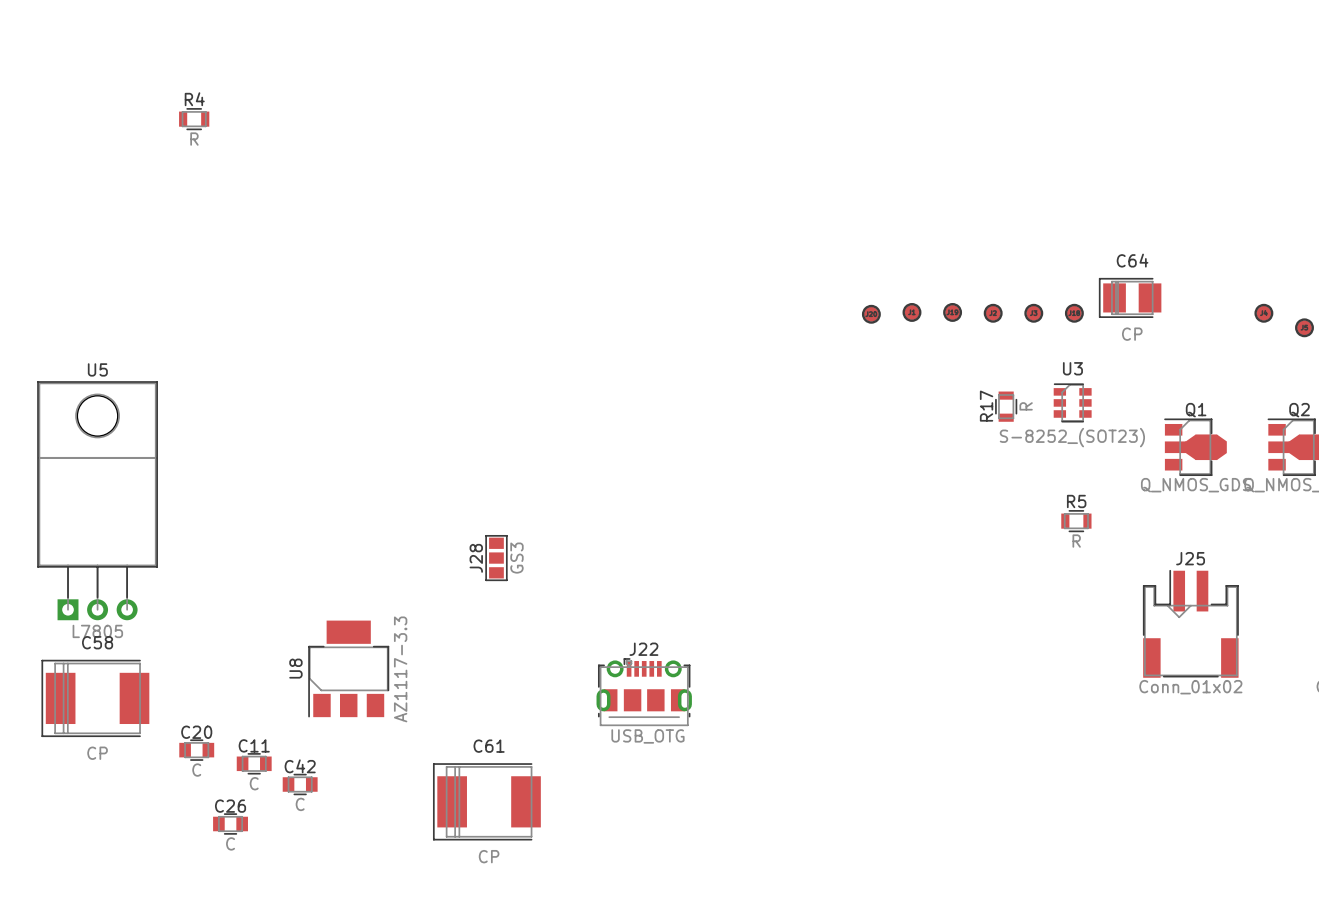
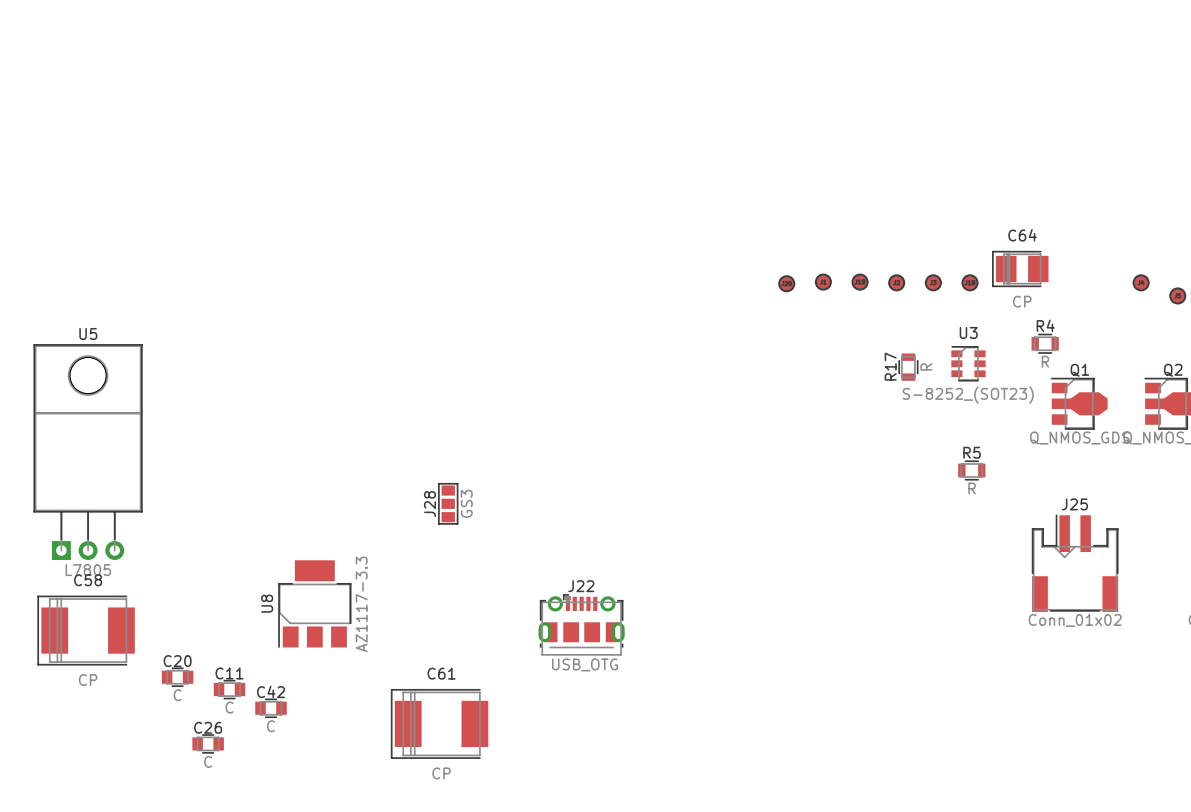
R4 position: (194, 119) -> (1045, 343)

